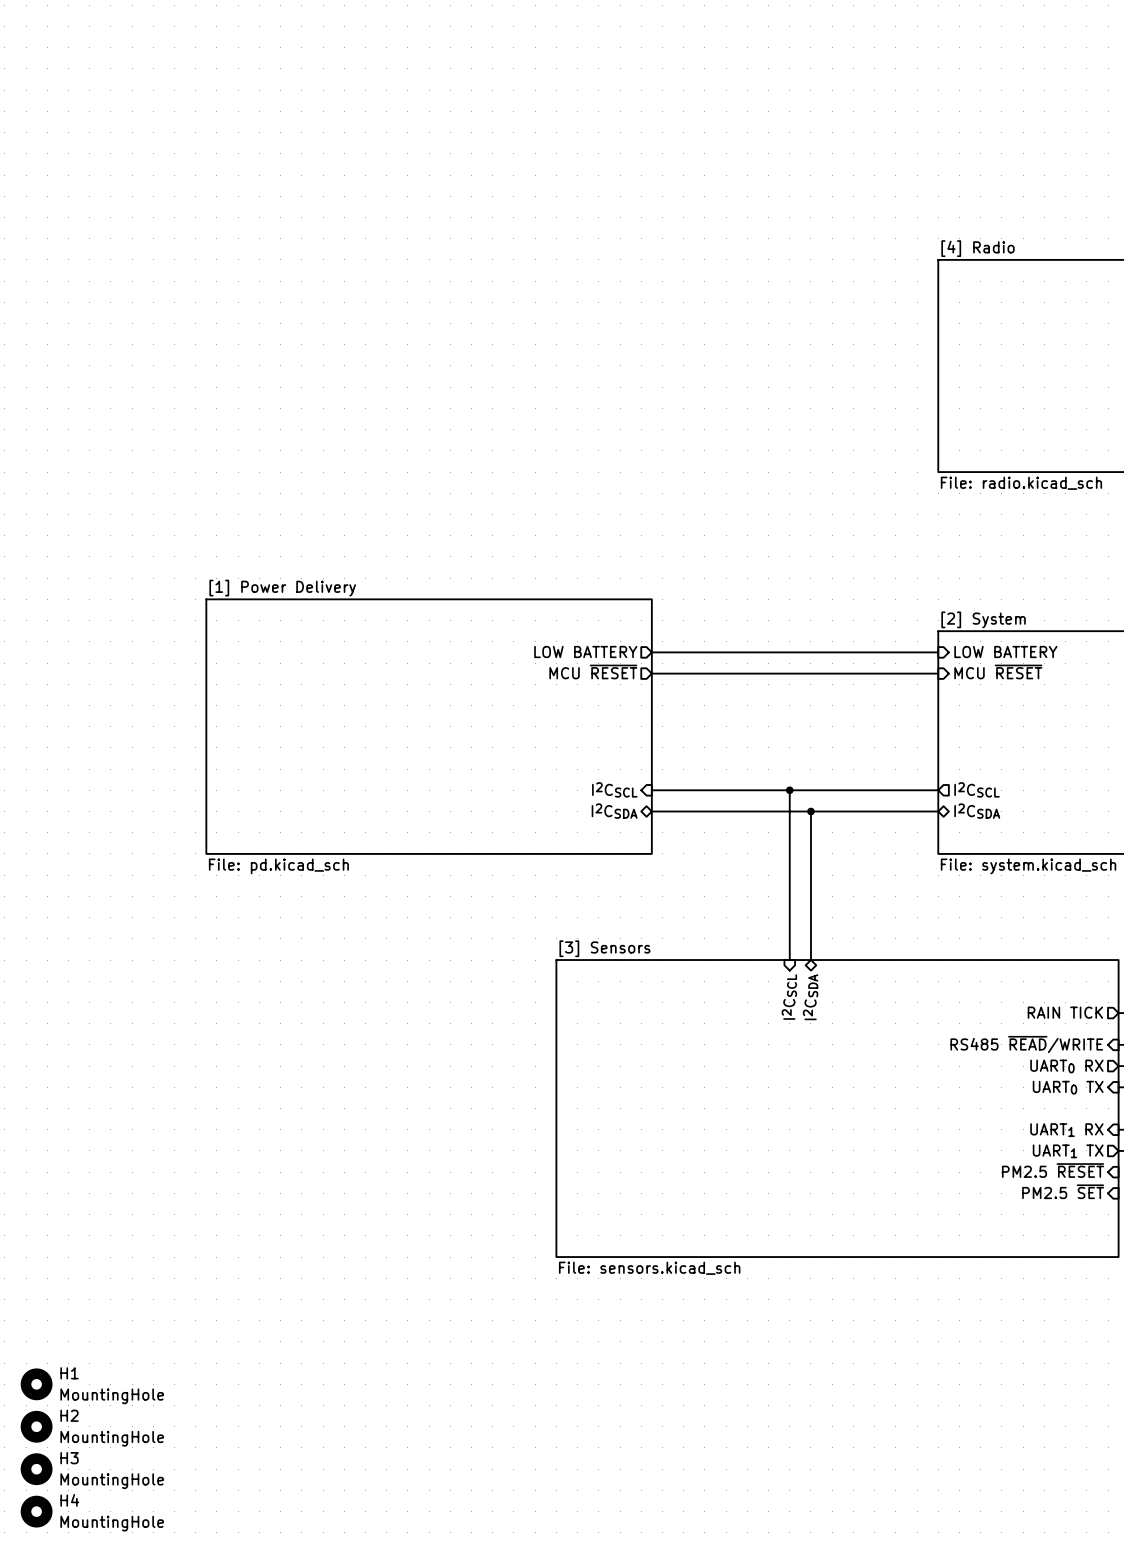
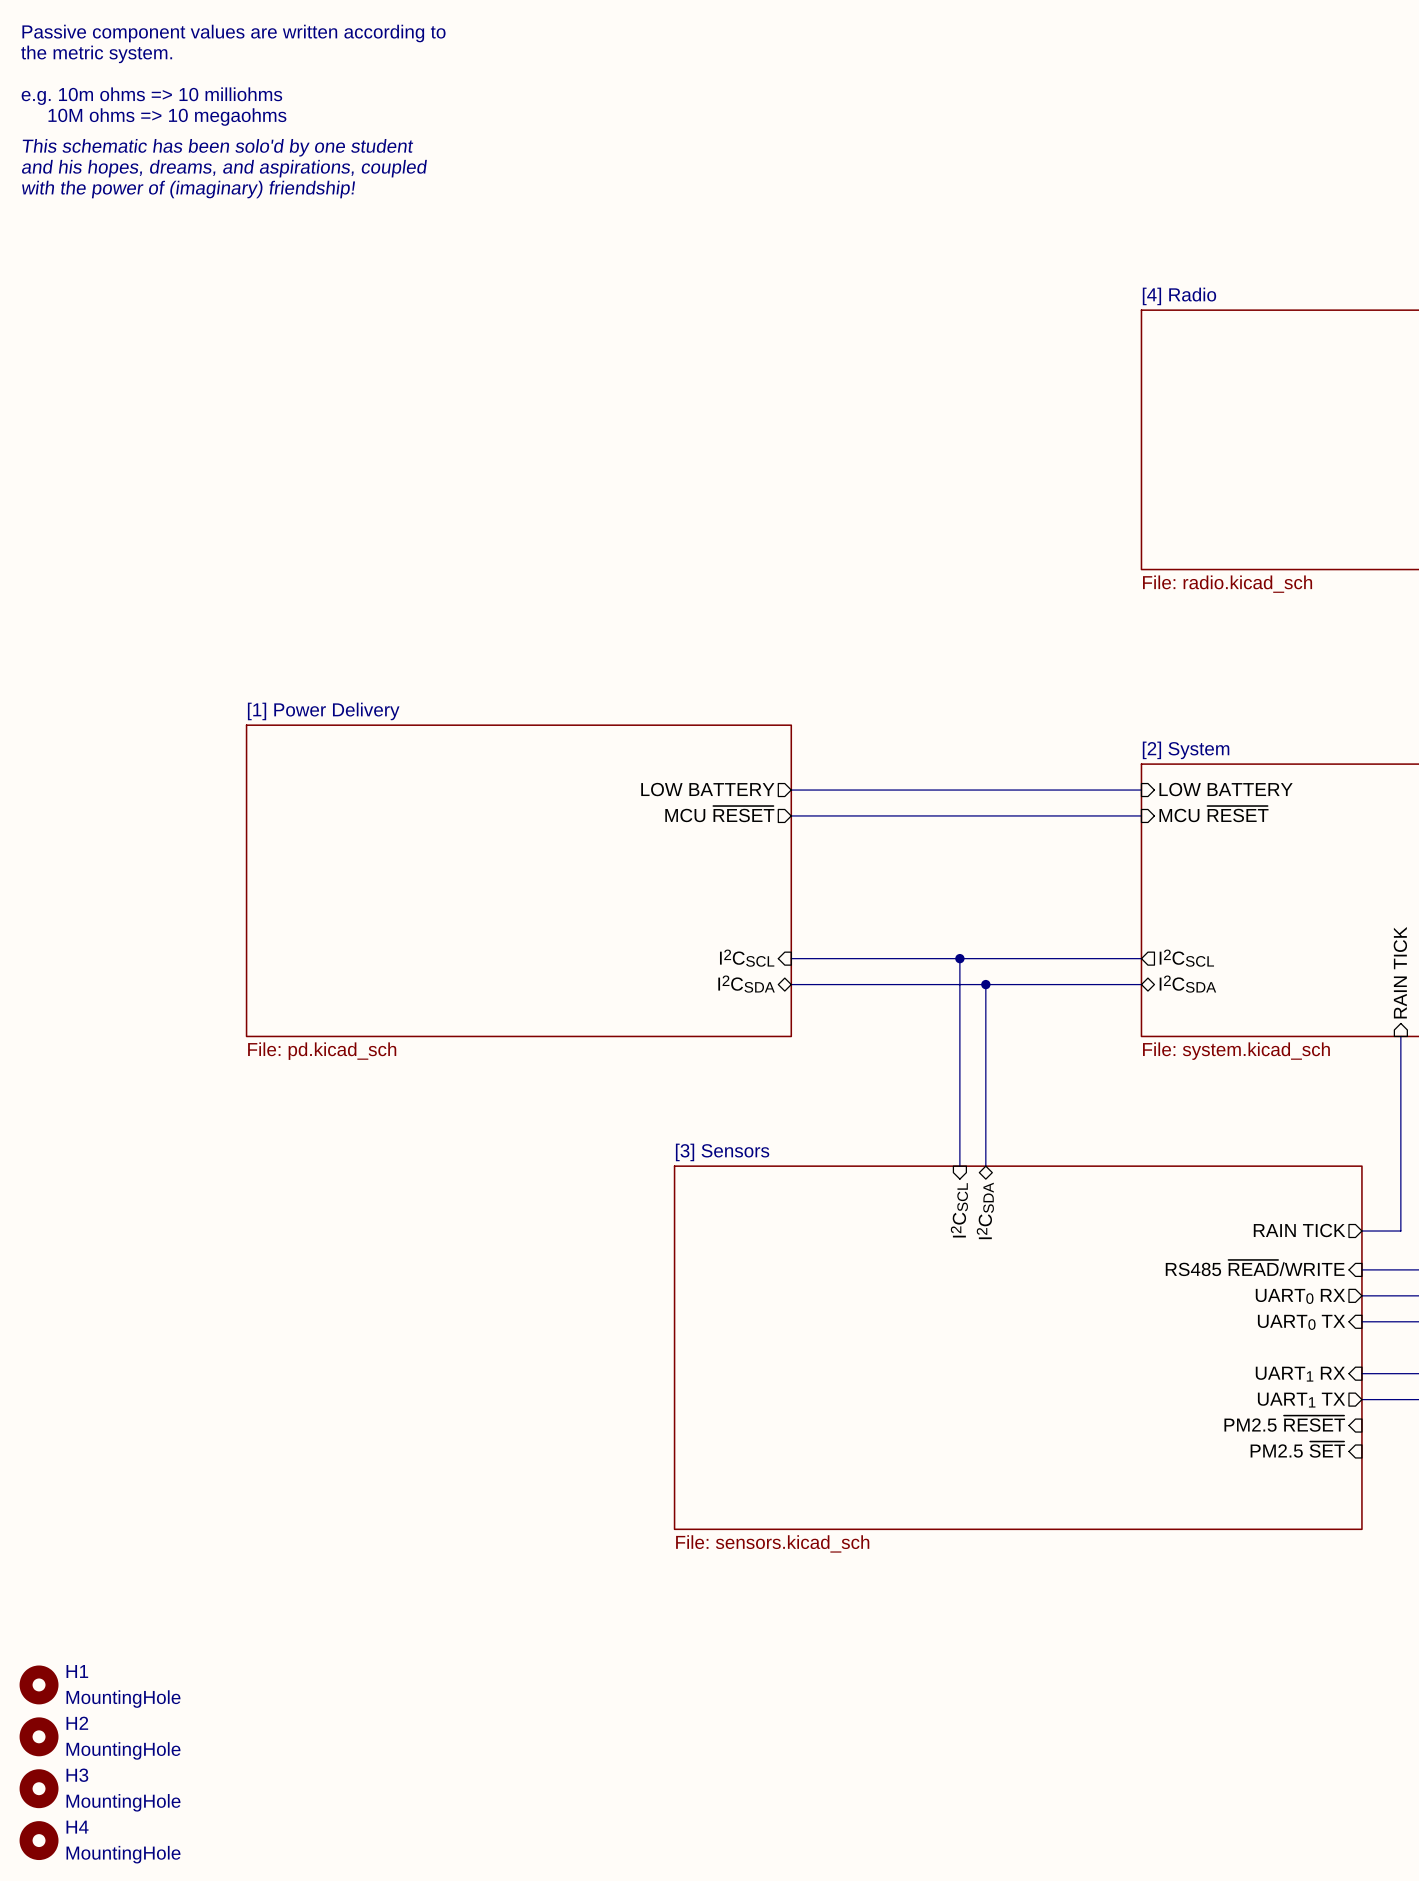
text: none -> Passive component values are written according to (233, 33)
text: none -> the metric system. (96, 54)
text: none -> e.g. 10m ohms => 10 milliohms (151, 96)
text: none -> 10M ohms => 10 megaohms (167, 117)
text: none -> This schematic has been solo'd by one student (217, 147)
text: none -> and his hopes, dreams, and aspirations, coupled (224, 168)
text: none -> with the power of (imaginary) friendship! (188, 189)

